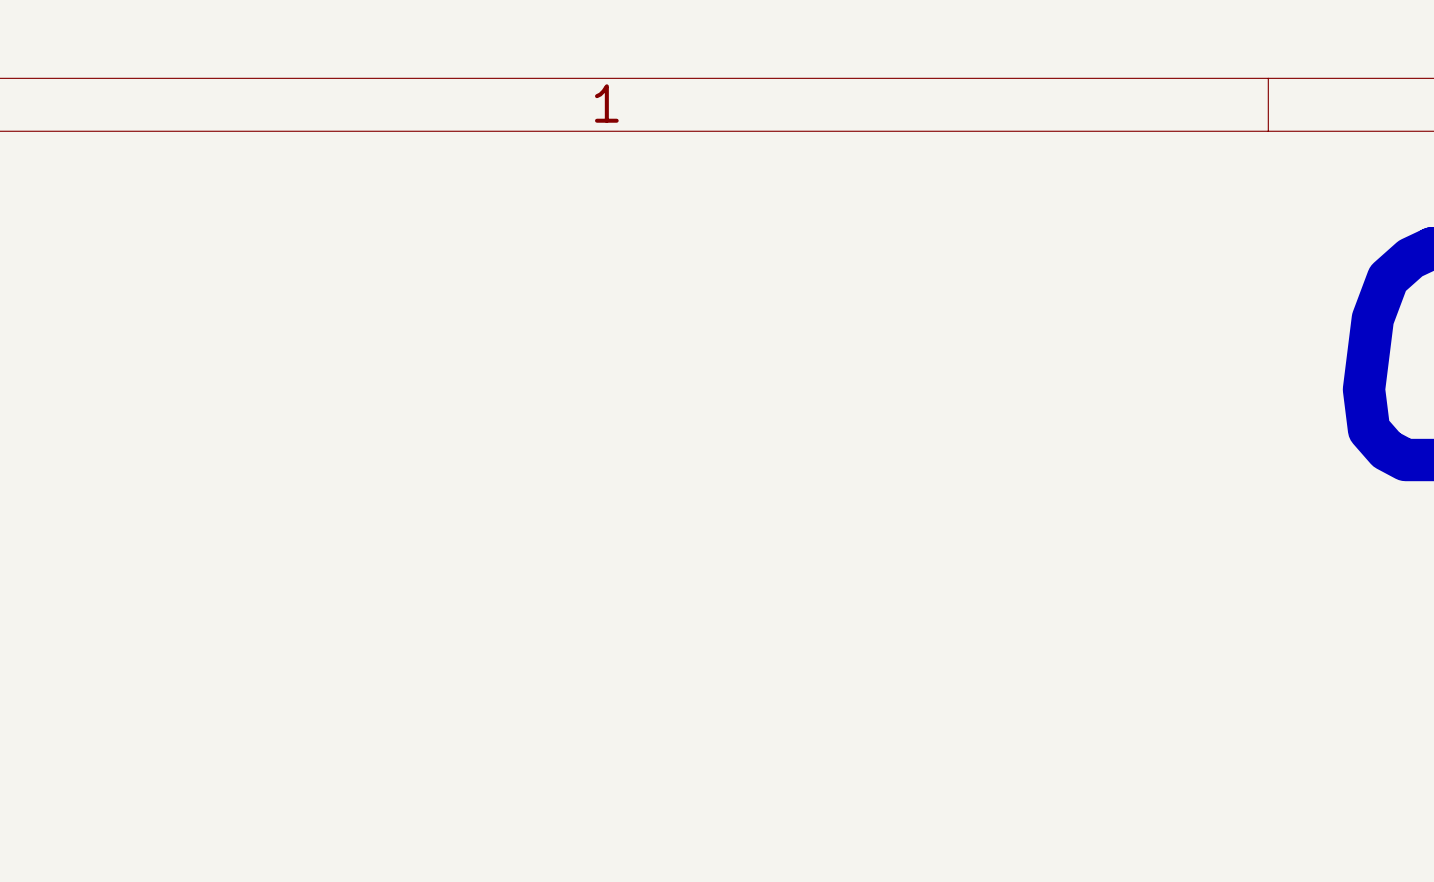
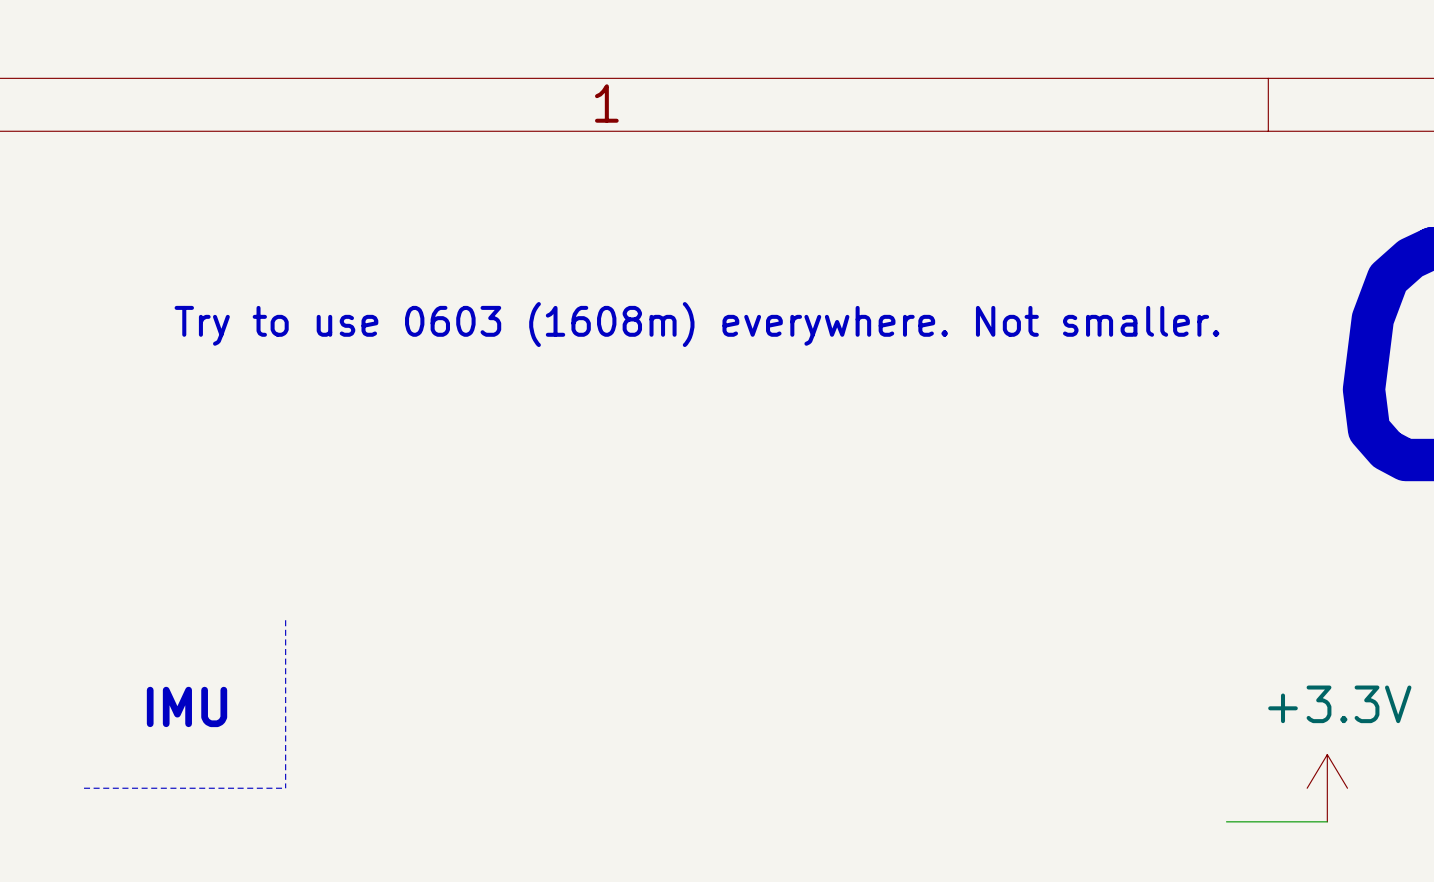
text: none -> Try to use 0603 (1608m) everywhere. Not smaller. (696, 324)
line: none -> (285, 620) (285, 788) (84, 788)
text: none -> IMU (187, 706)
power symbol: none -> +3.3V (1327, 788)
wire: none -> (1226, 821) (1327, 821)

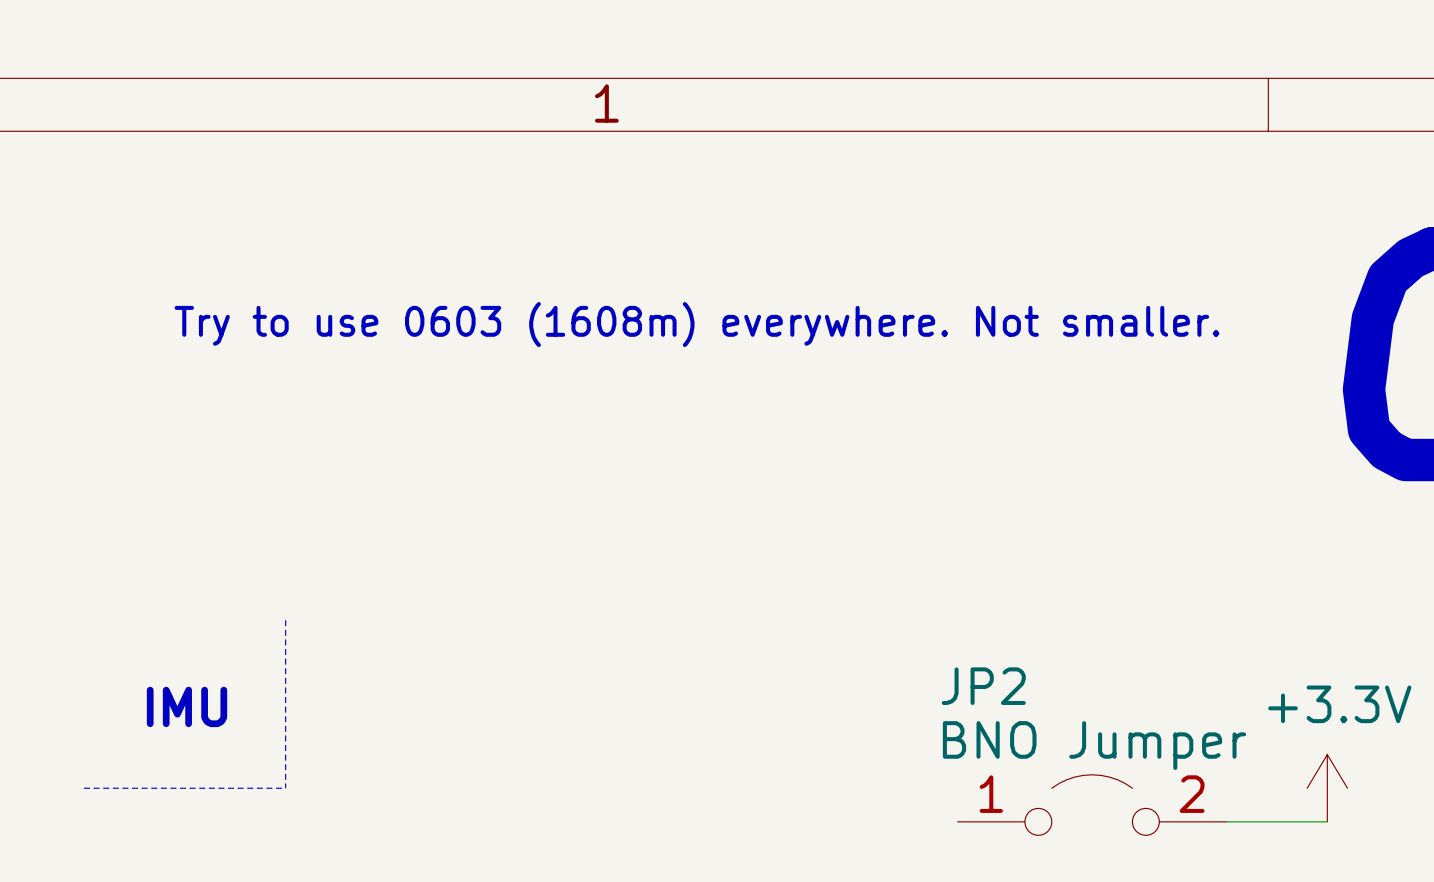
JP2: none -> BNO Jumper (1092, 805)

